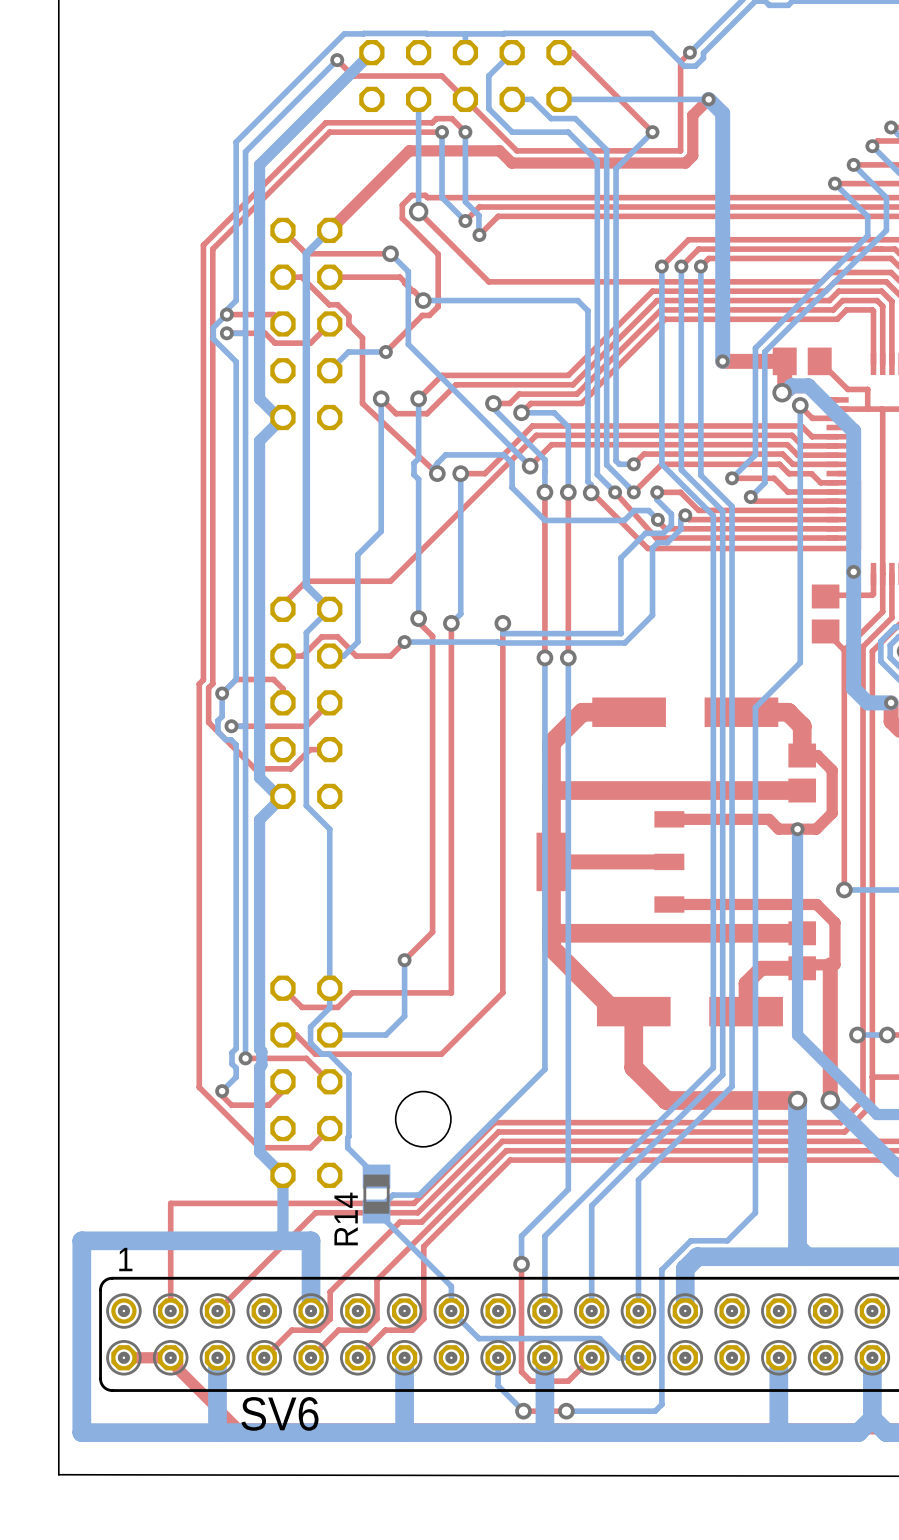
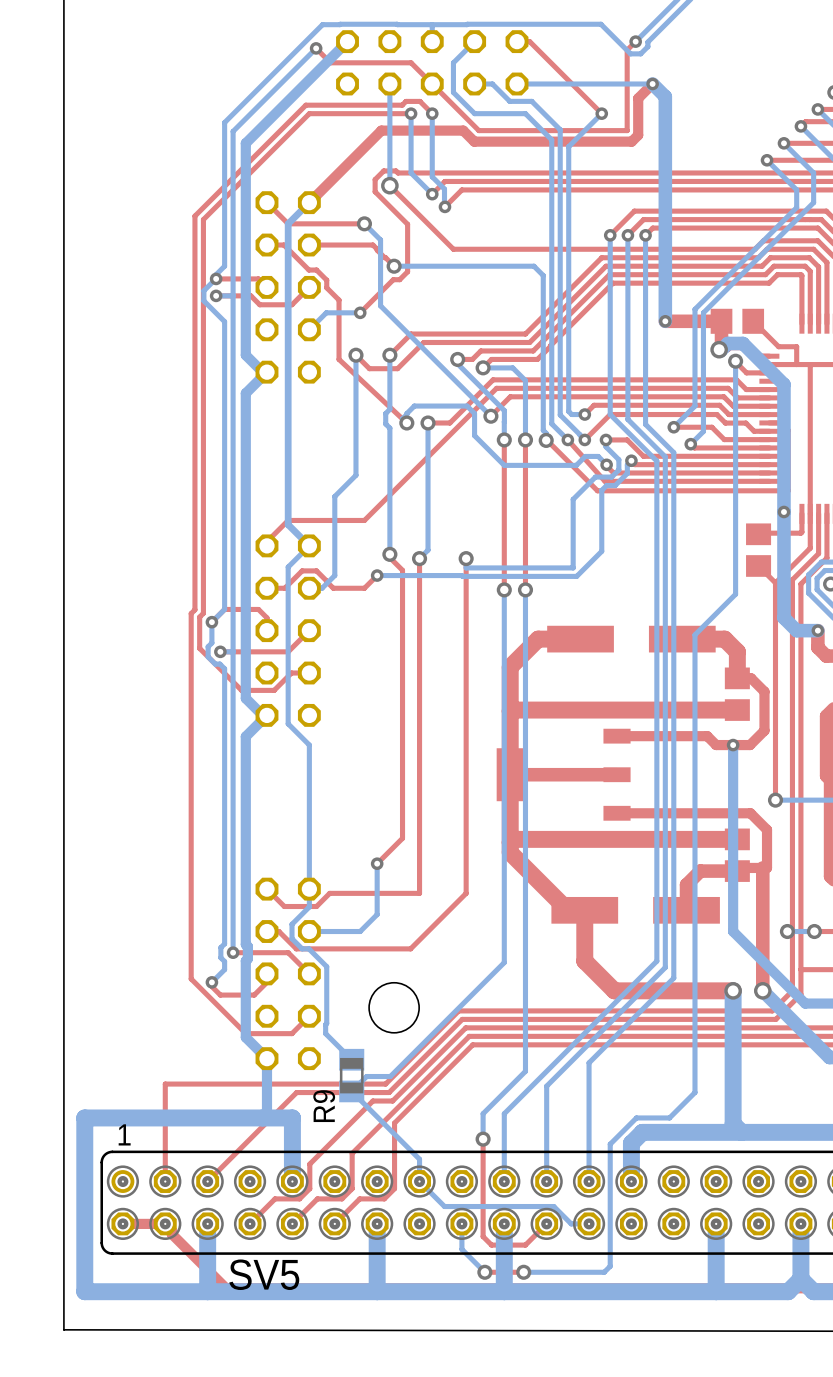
R14 name: R14 (346, 1218) -> R9 (324, 1106)
SV6 name: SV6 (279, 1413) -> SV5 (264, 1274)

